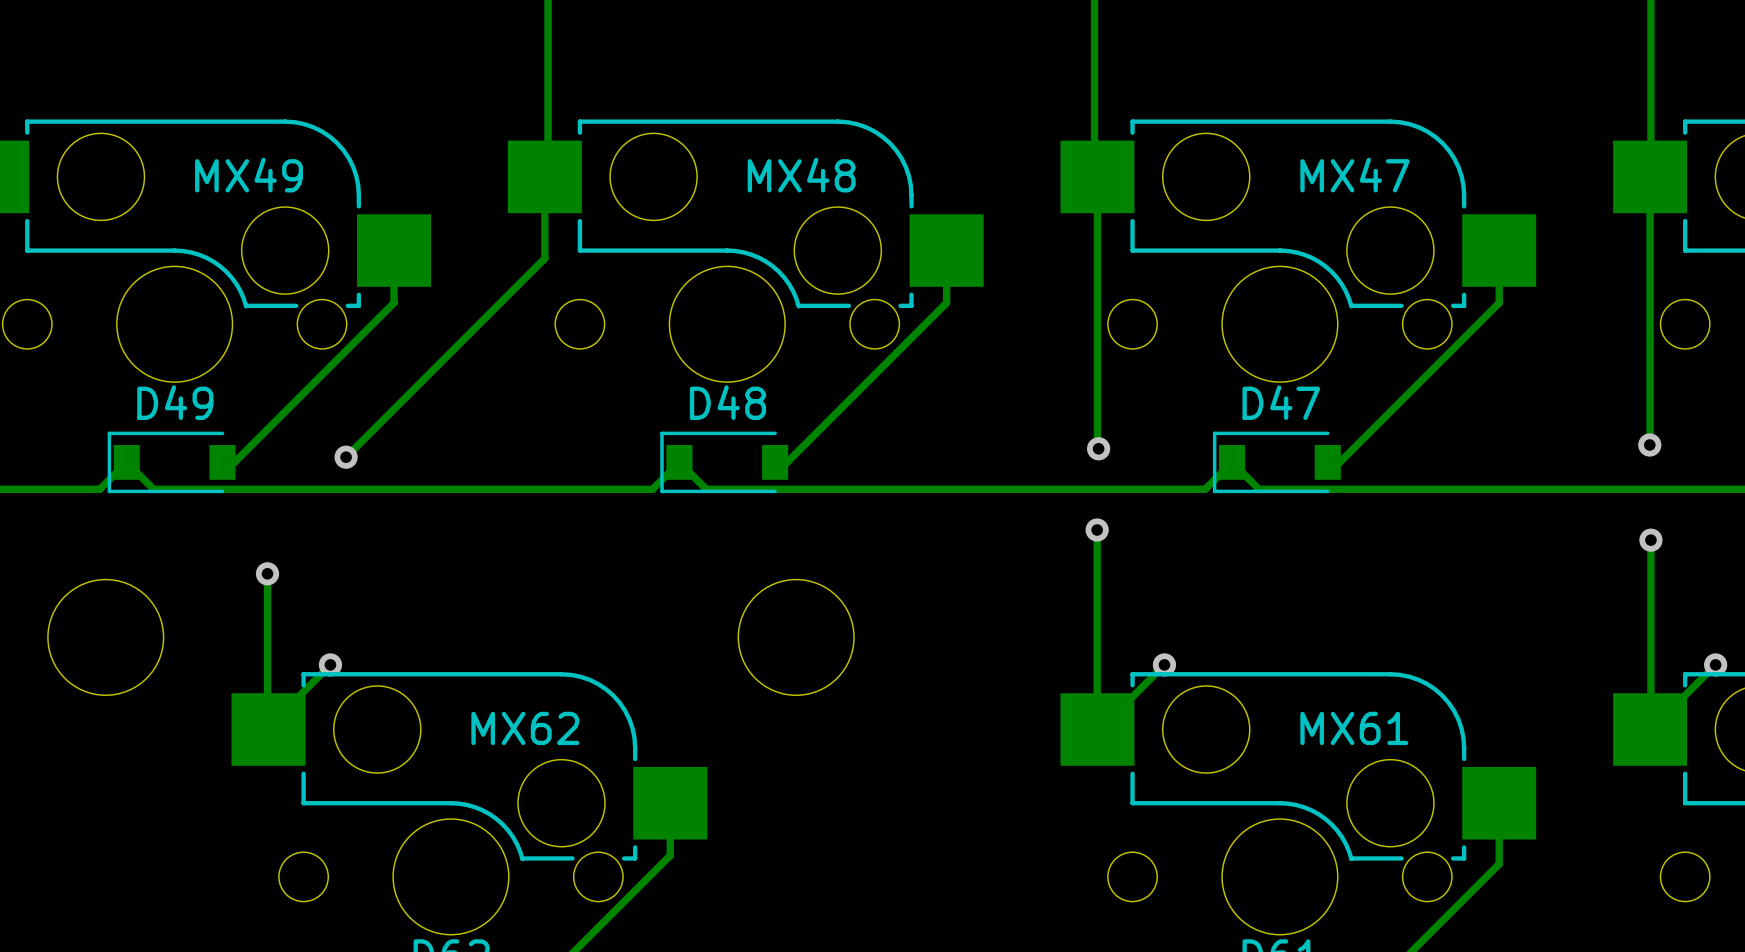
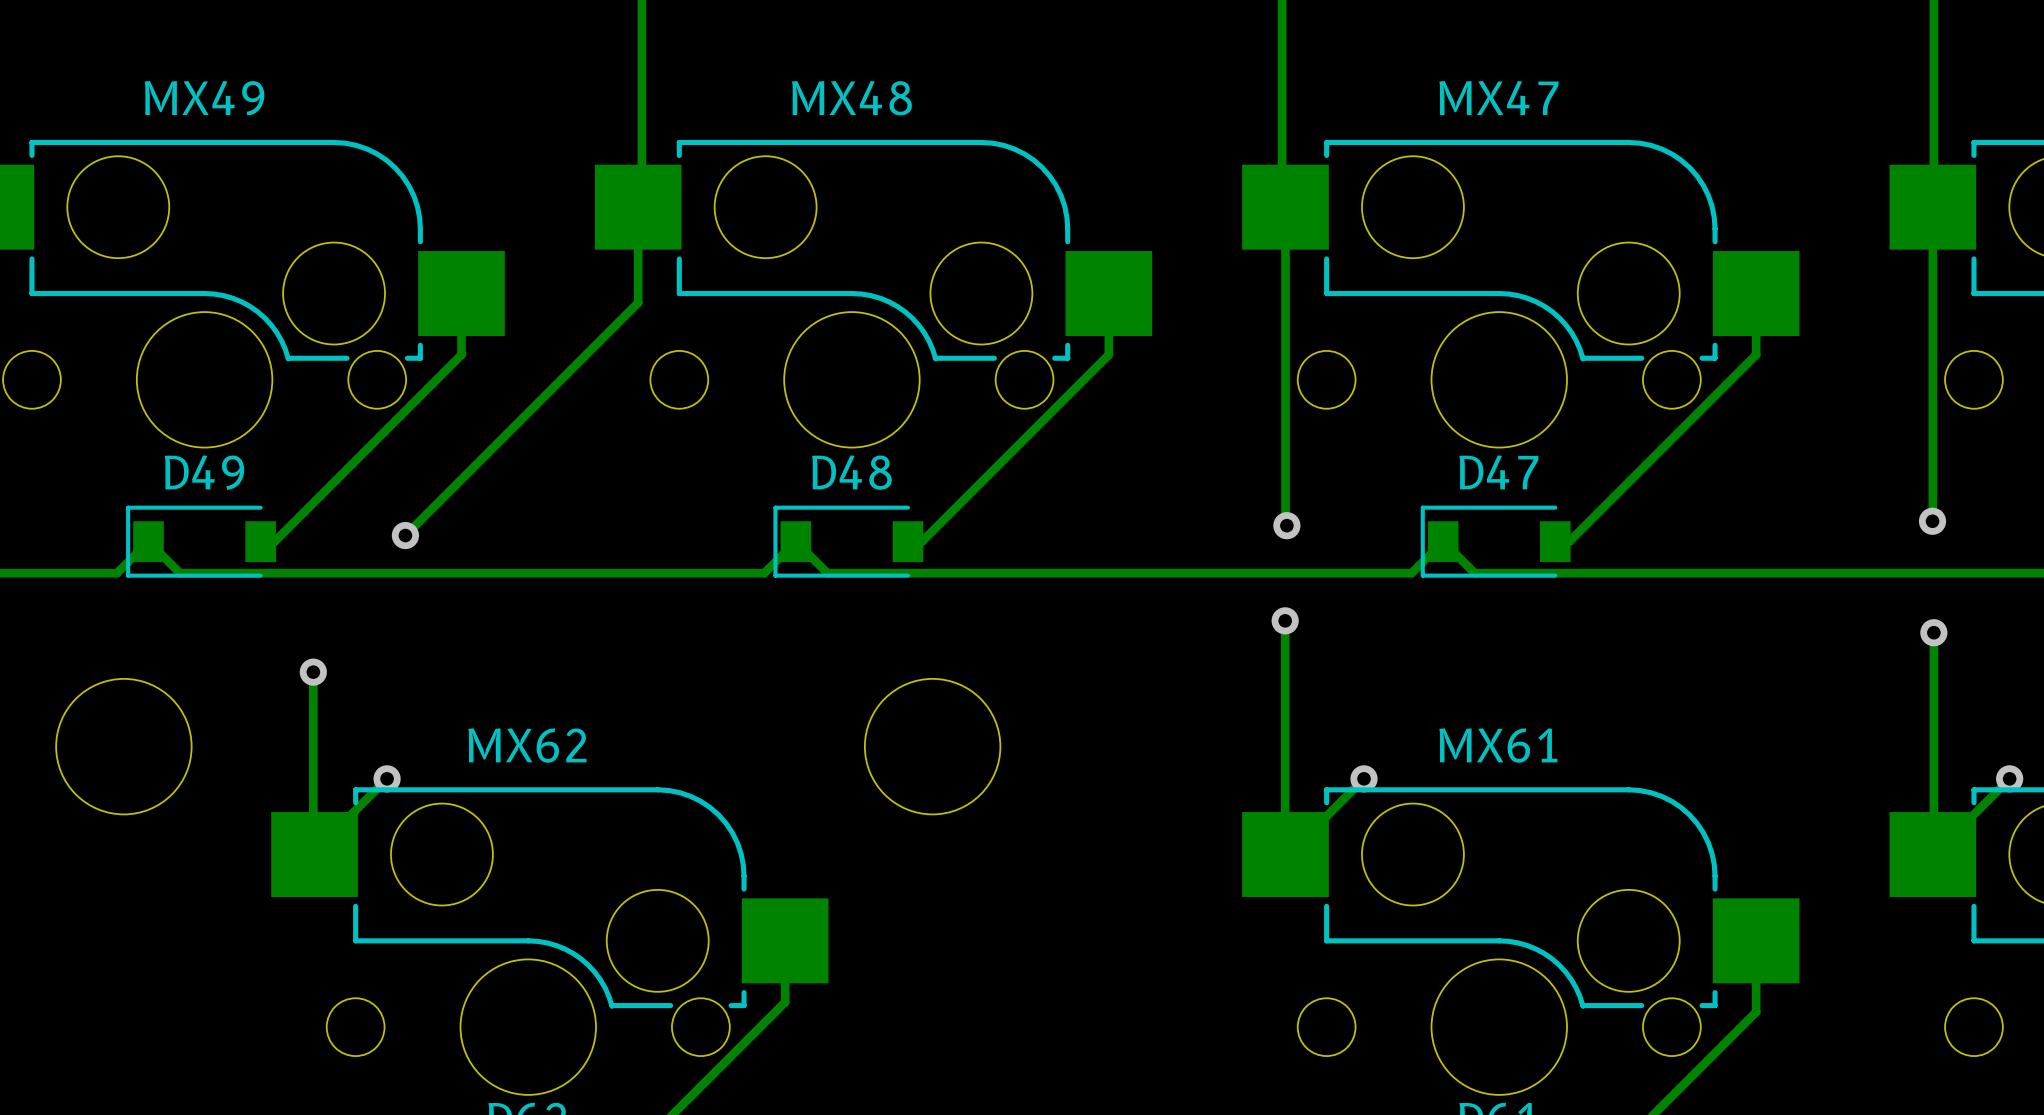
MX49 name position: MX49 (249, 175) -> MX49 (204, 98)
MX48 name position: MX48 (801, 175) -> MX48 (851, 98)
MX47 name position: MX47 (1354, 175) -> MX47 (1498, 98)
MX62 name position: MX62 (525, 728) -> MX62 (527, 745)
MX61 name position: MX61 (1354, 728) -> MX61 (1498, 745)

